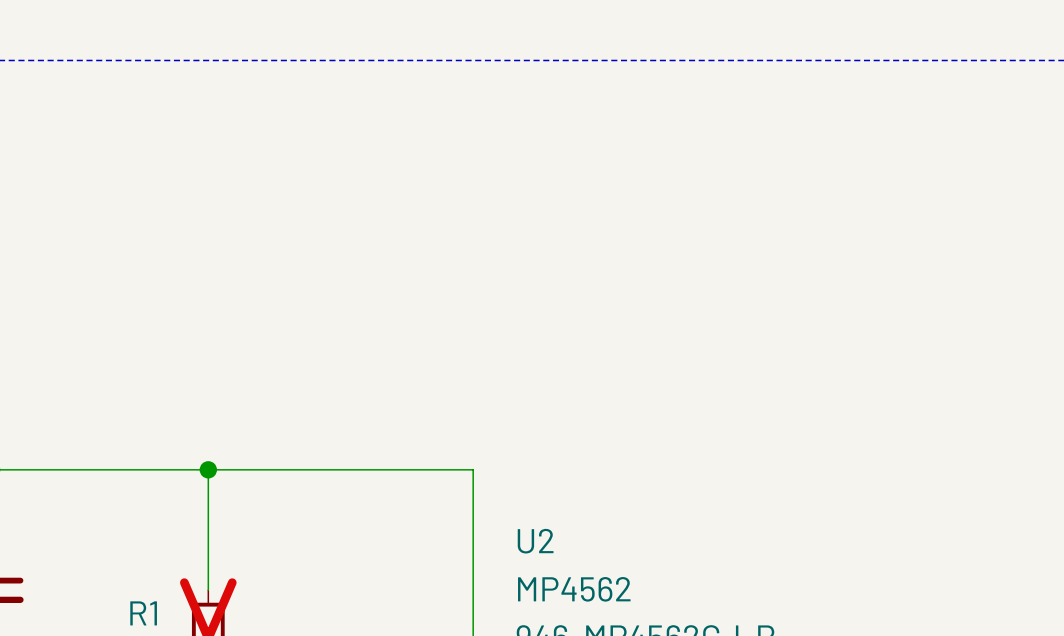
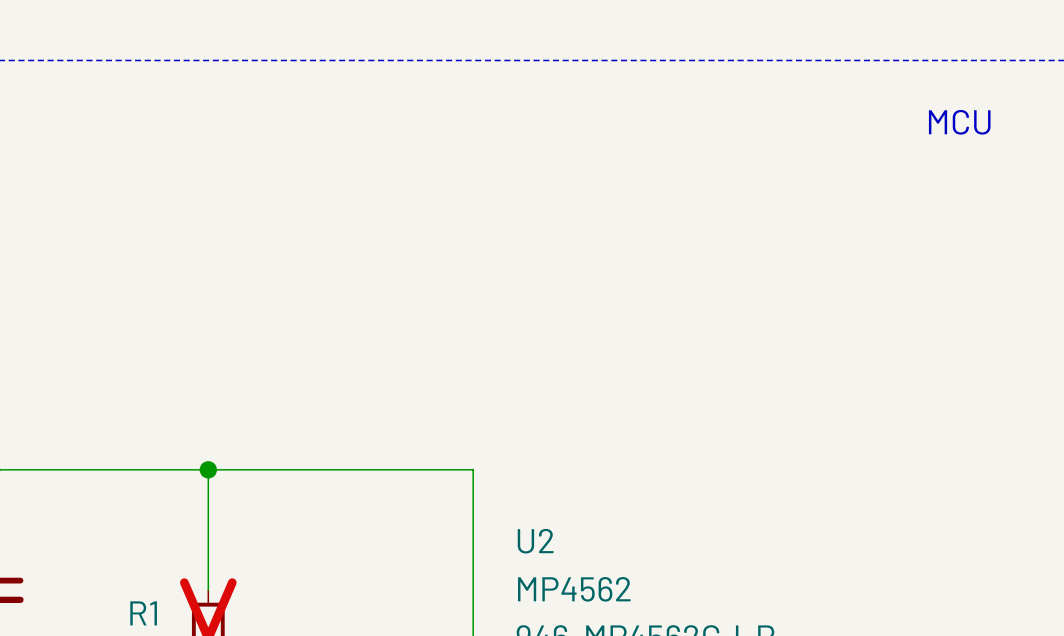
text: none -> MCU (959, 122)

